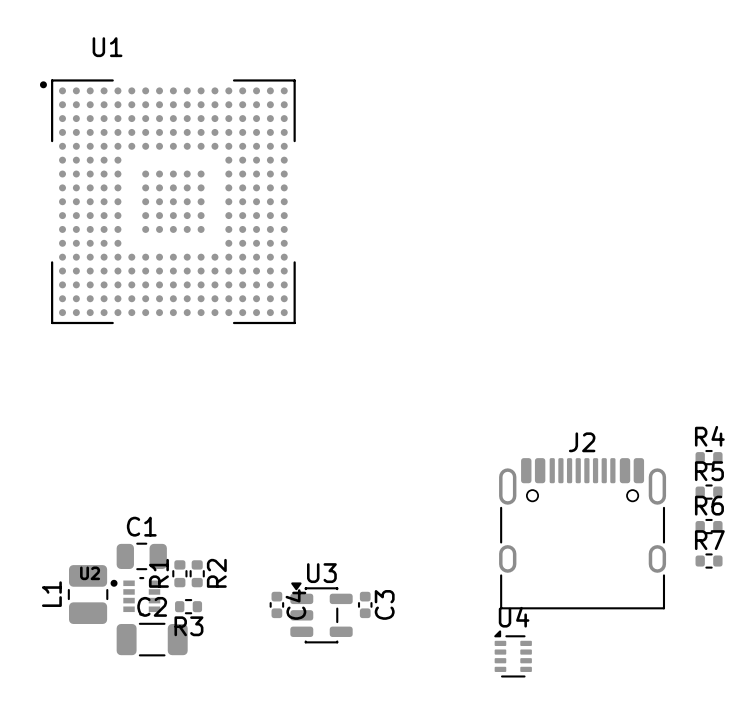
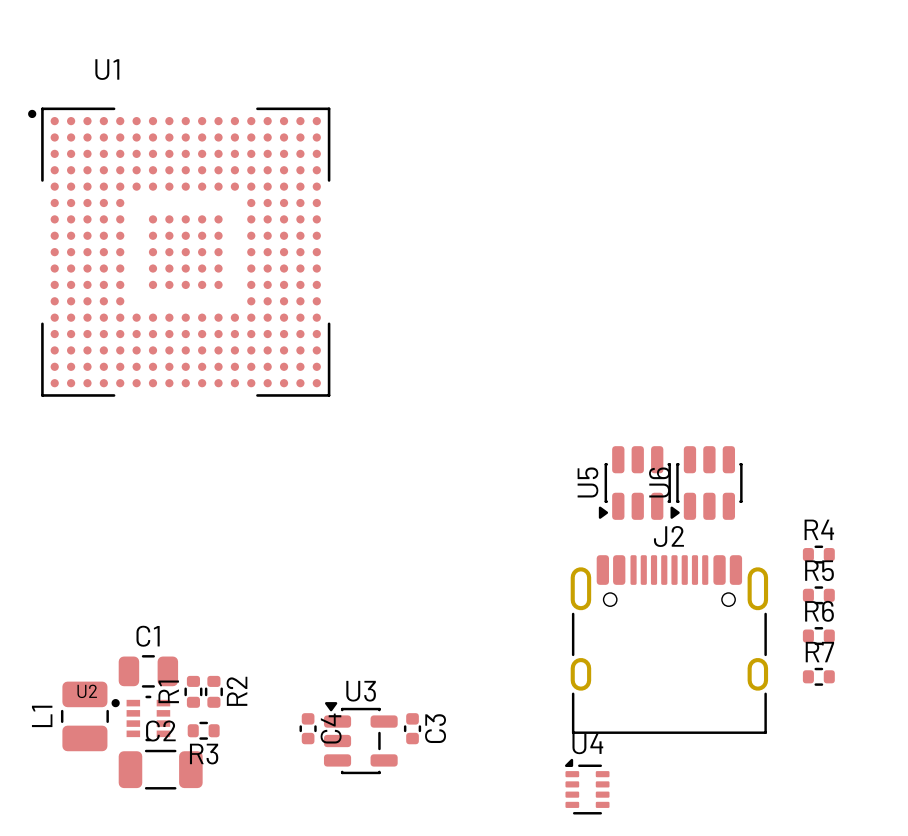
U5: none -> (634, 483)
U6: none -> (706, 483)

